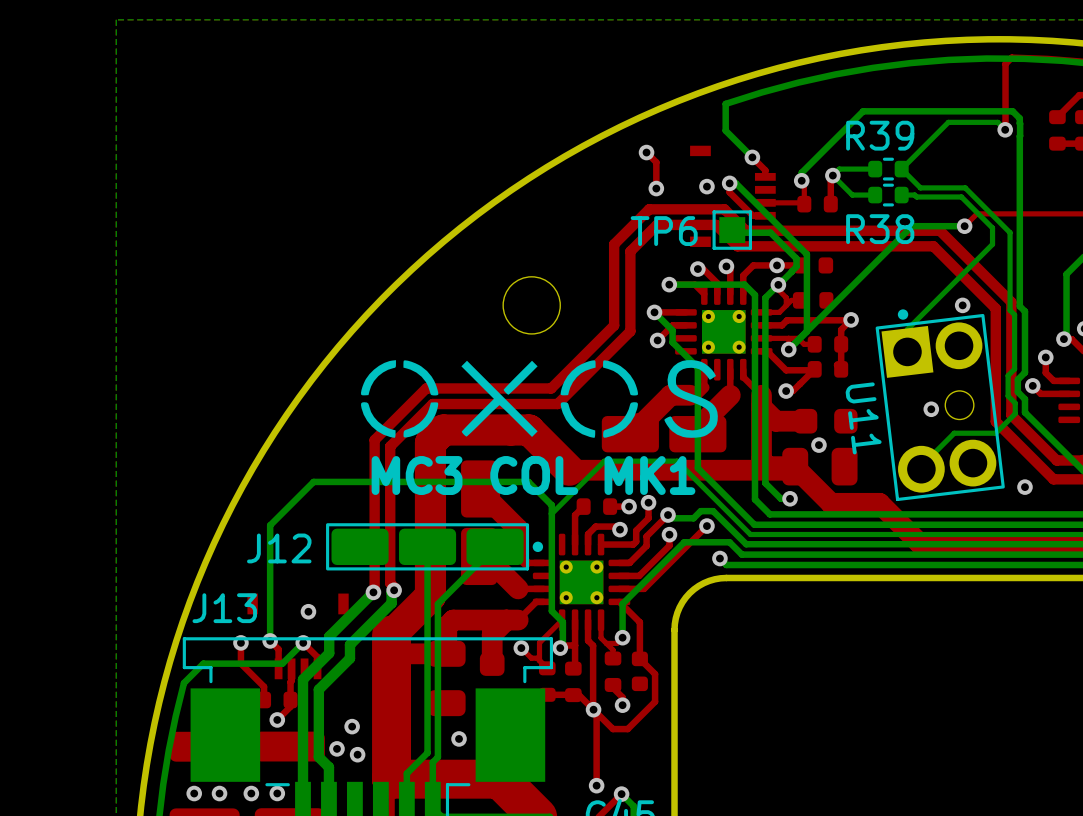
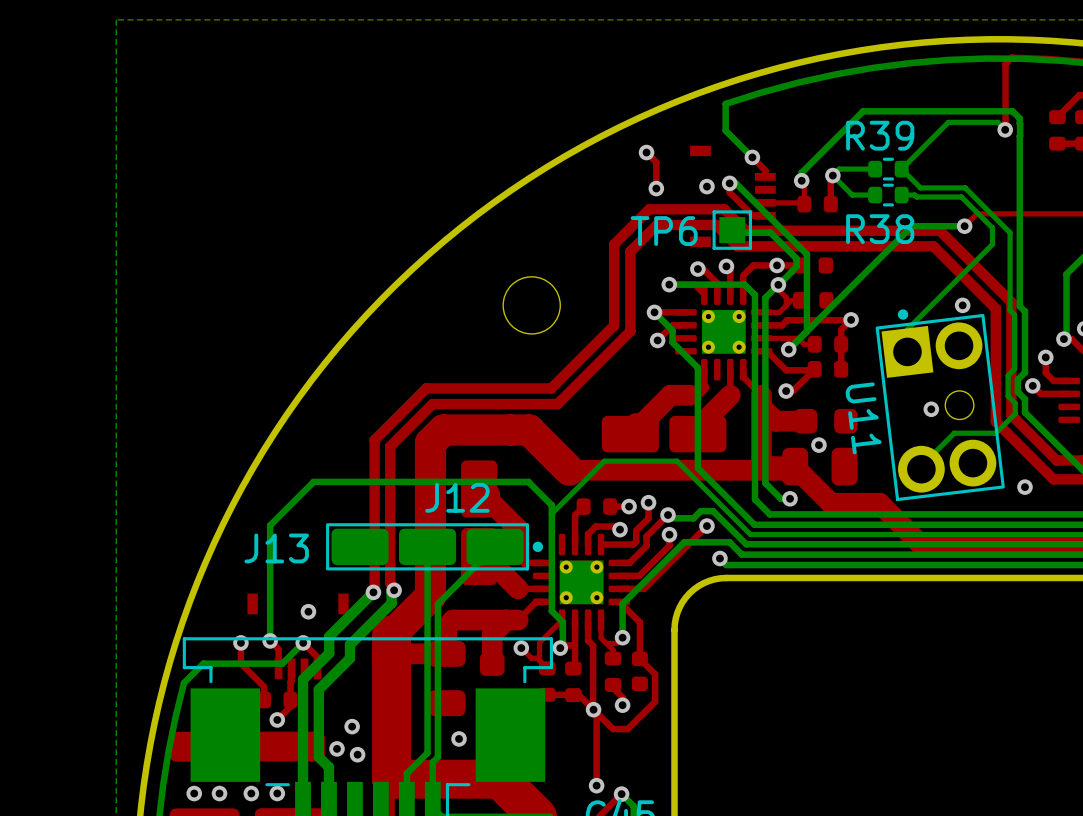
drawing: [361, 360, 718, 438] -> none
text: MC3 COL MK1 (533, 475) -> none
J12 name position: J12 (279, 548) -> J12 (457, 497)
J13 name position: J13 (224, 608) -> J13 (276, 548)

